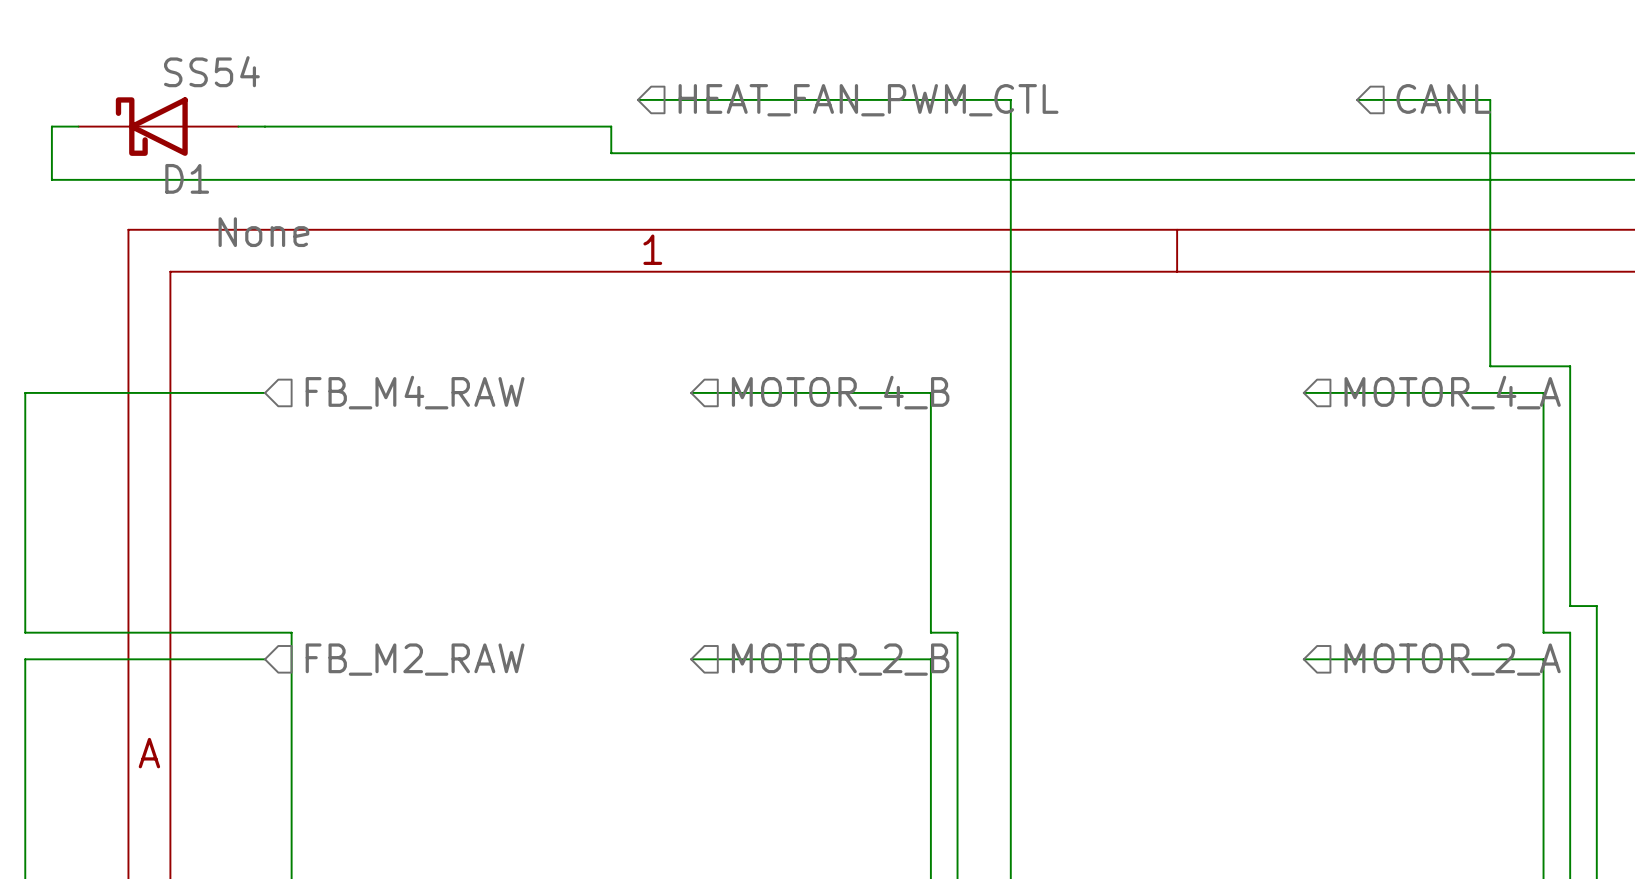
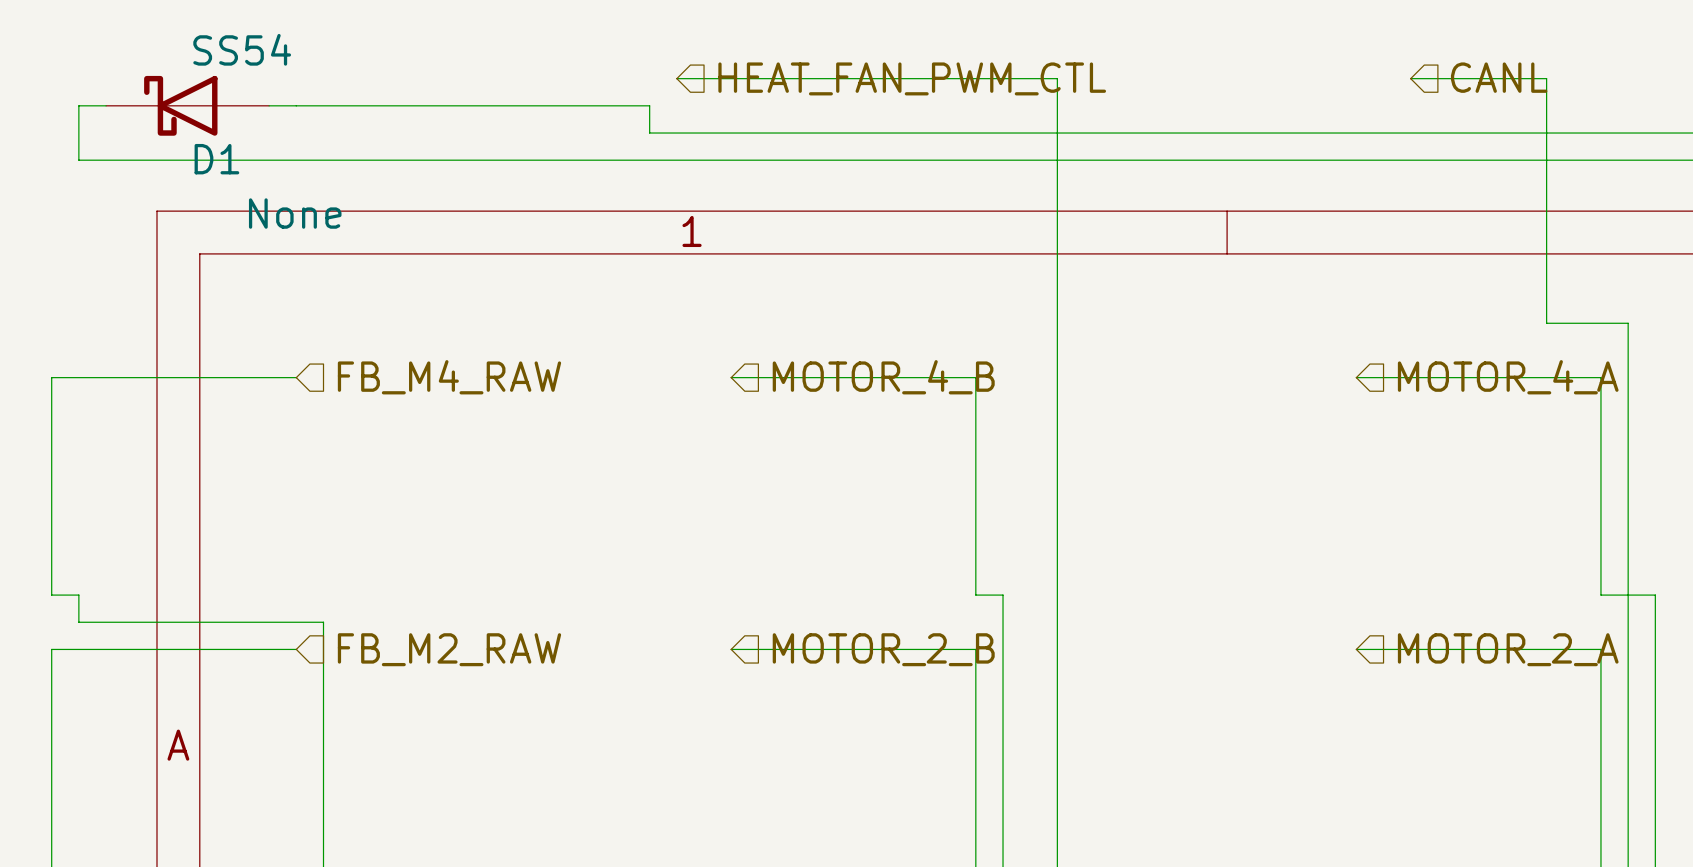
wire: (1490, 339) (1490, 366) (1570, 366) -> (1546, 323) (1628, 323) (1628, 350)
wire: (25, 606) (25, 632) (51, 632) -> (51, 595) (78, 595) (78, 622)
wire: (930, 606) (930, 632) (957, 632) -> (975, 595) (1003, 595) (1003, 622)
wire: (1543, 606) (1543, 632) (1570, 632) -> (1600, 595) (1628, 595) (1628, 622)

